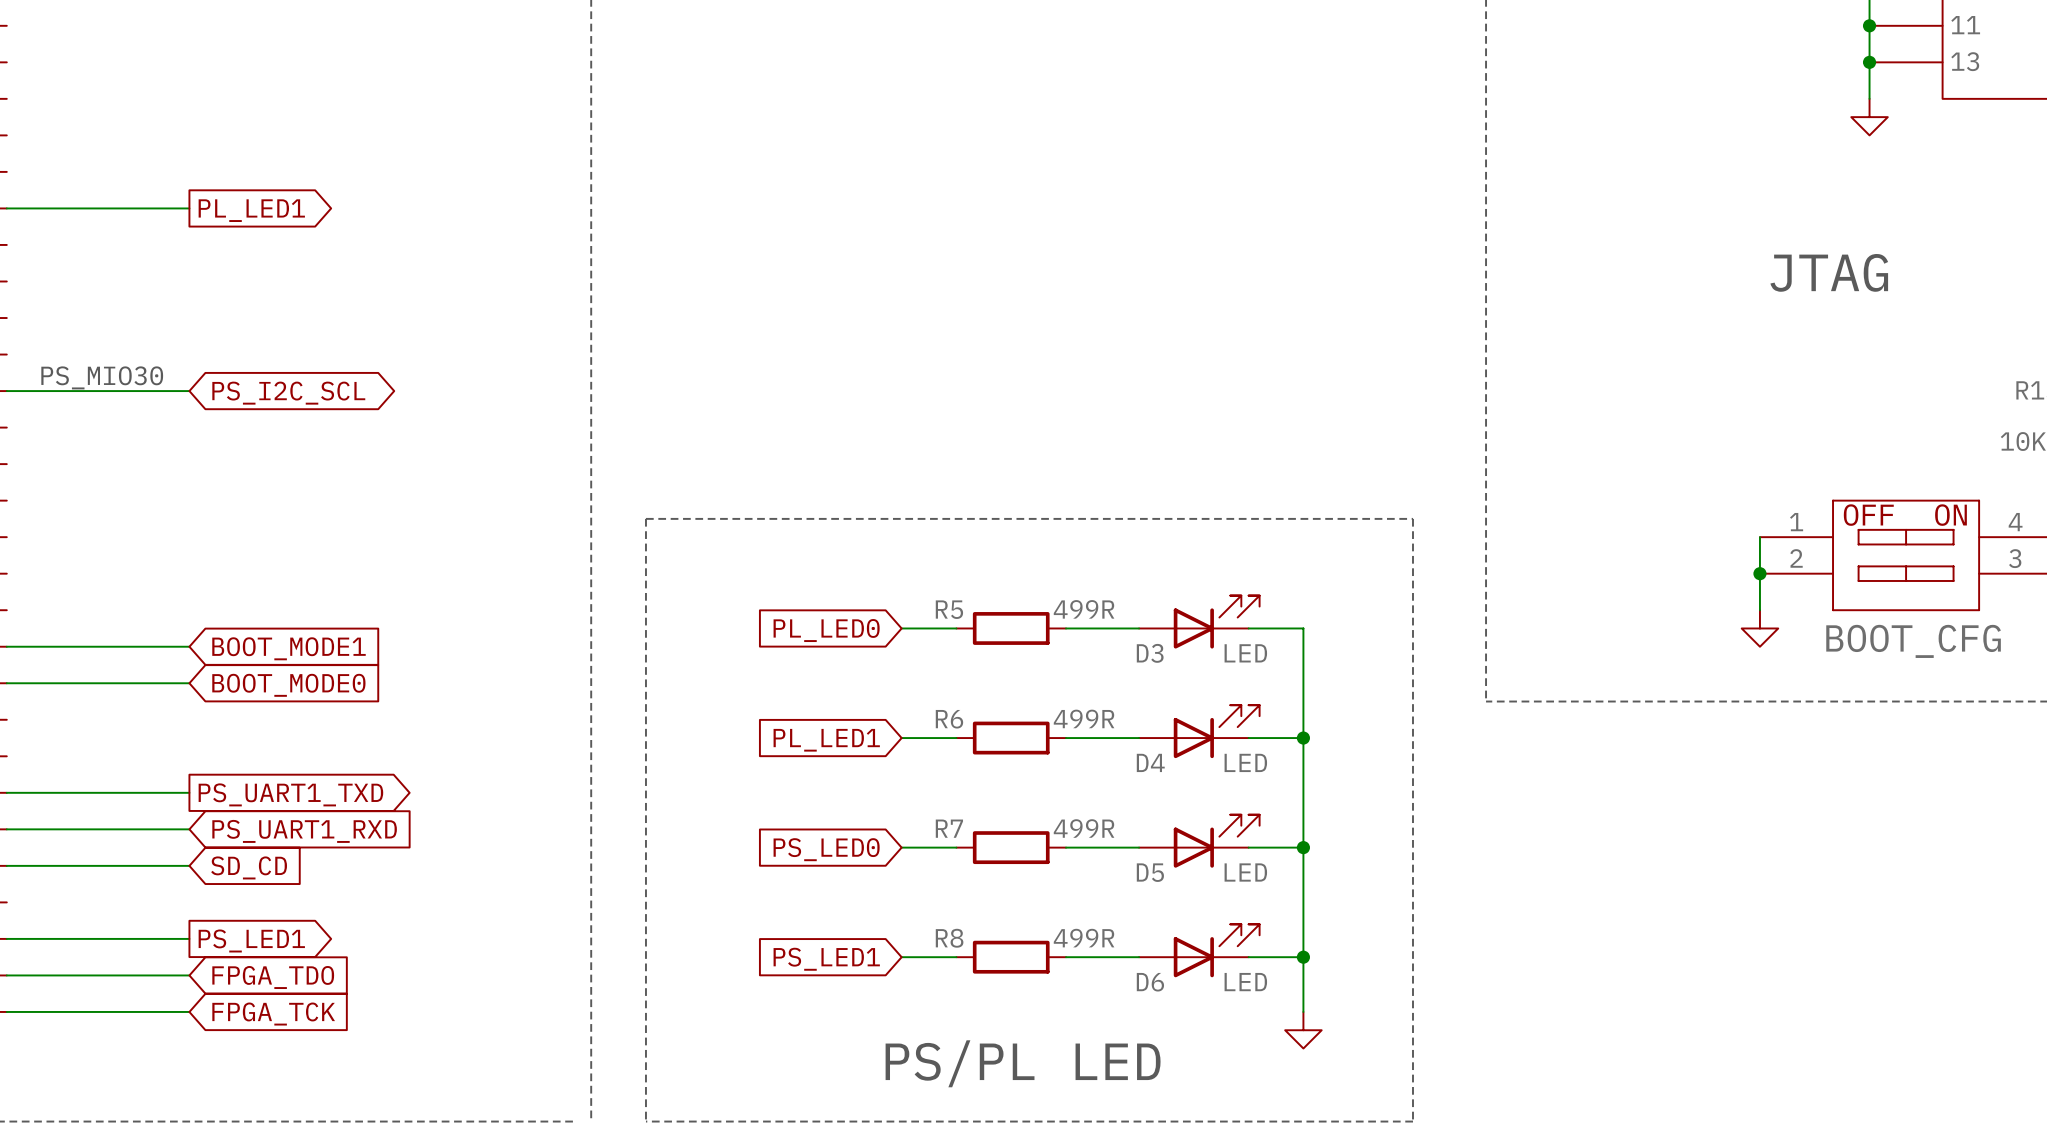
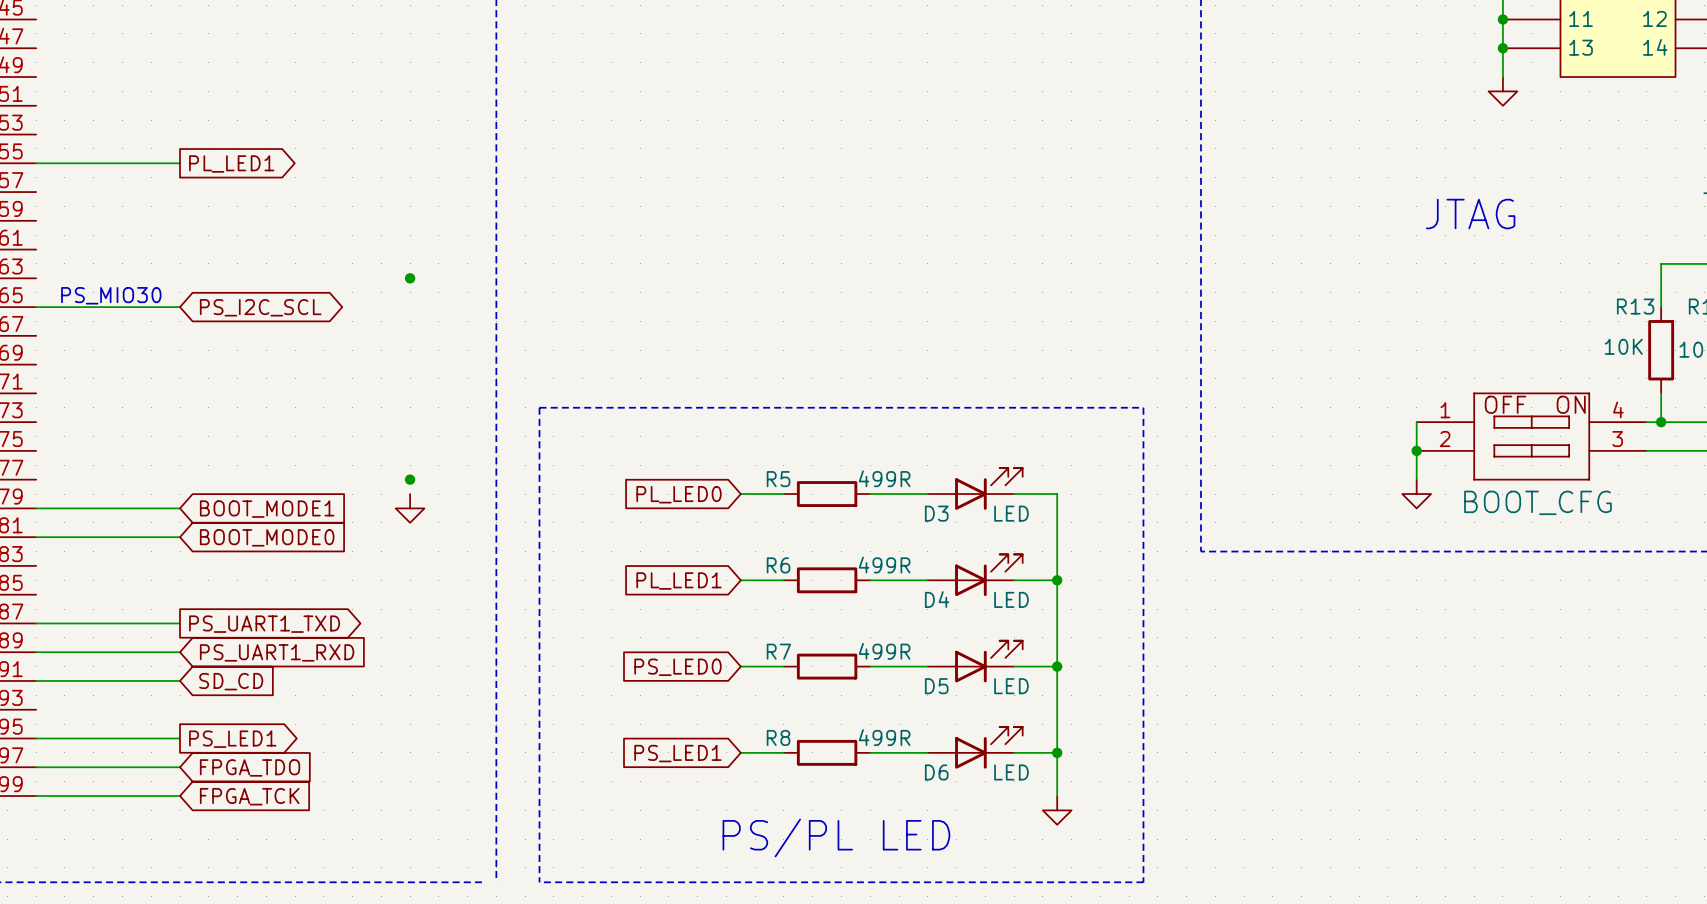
junction: none -> (410, 278)
junction: none -> (410, 479)
power symbol: none -> (410, 508)

